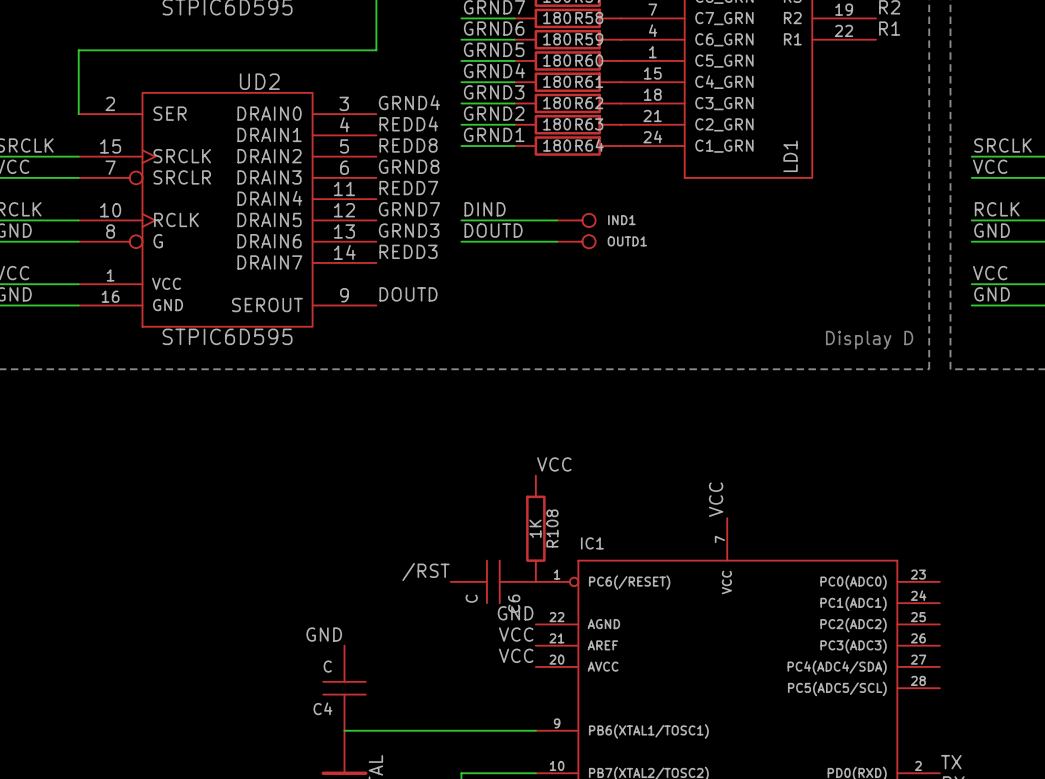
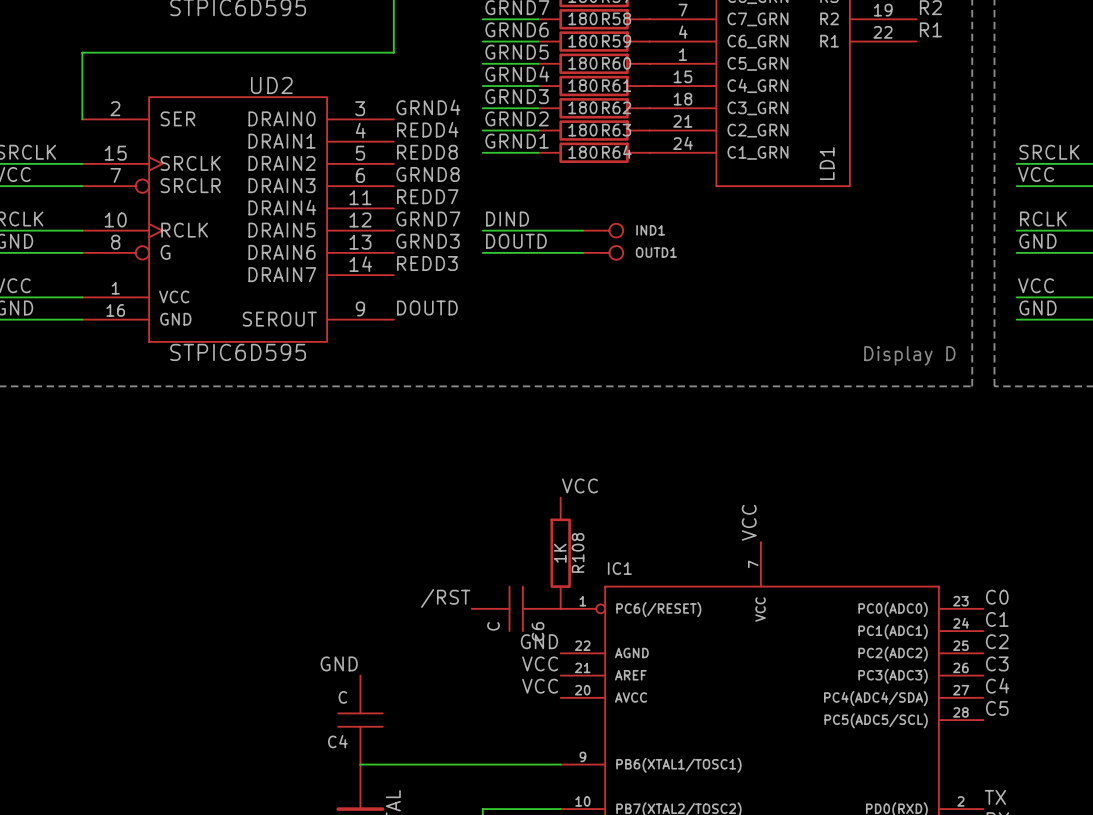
label: none -> C0 (997, 597)
label: none -> C1 (997, 619)
label: none -> C2 (997, 641)
label: none -> C3 (997, 663)
label: none -> C4 (997, 685)
label: none -> C5 (997, 708)

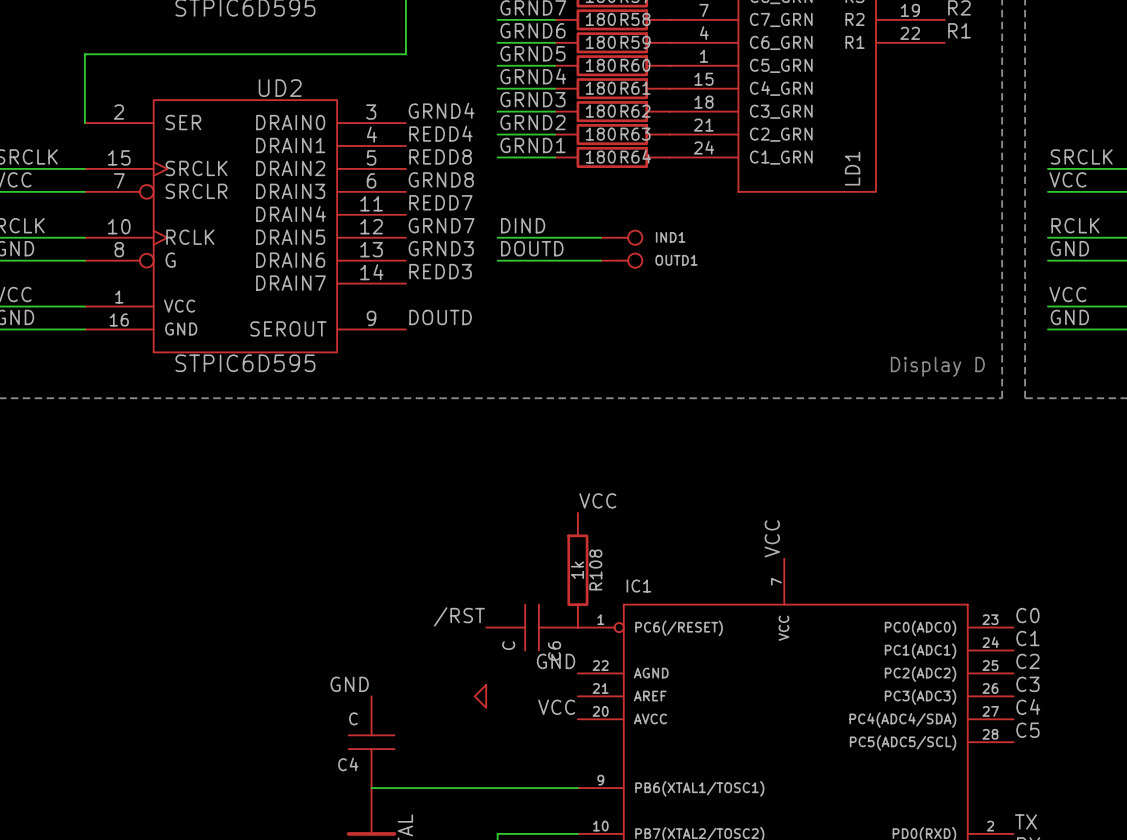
R108 value: 1K (560, 553) -> 1k (577, 570)
label: VCC (540, 663) -> none
power symbol: none -> (480, 696)

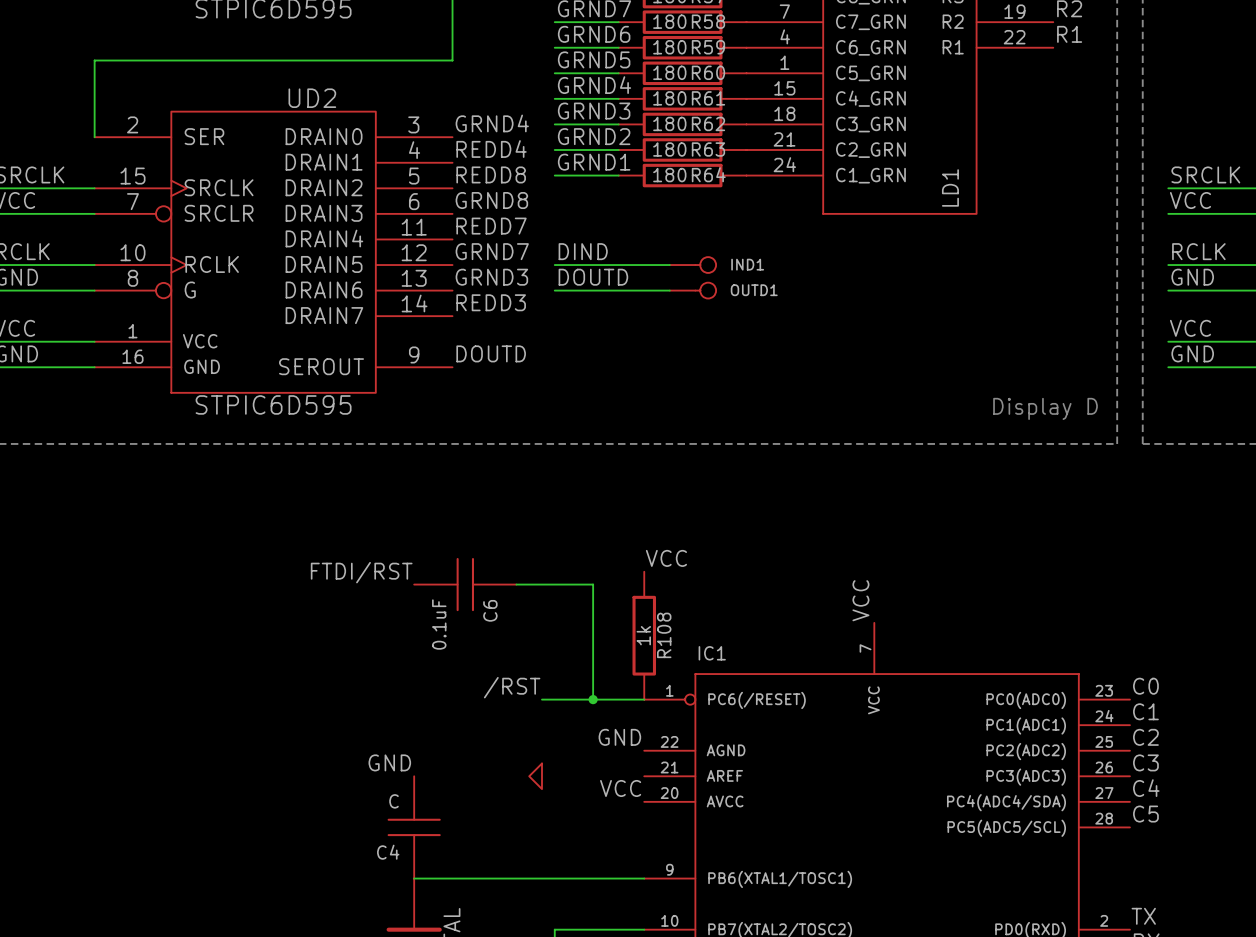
label: none -> FTDI/RST (361, 572)
wire: none -> (516, 584) (593, 584) (593, 699)
C6 position: (532, 627) -> (465, 584)
junction: none -> (593, 699)
C6 value: C (508, 645) -> 0.1uF (439, 624)

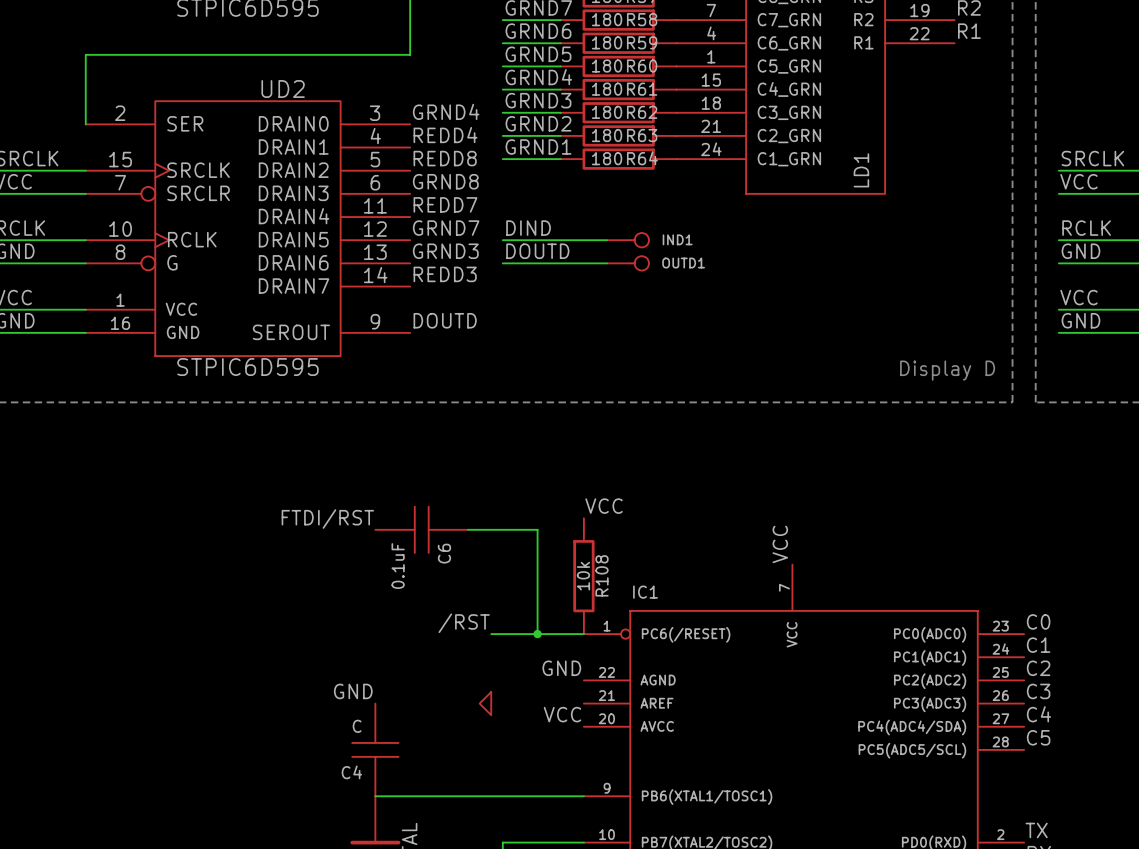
R108 value: 1k (643, 635) -> 10k (583, 576)

